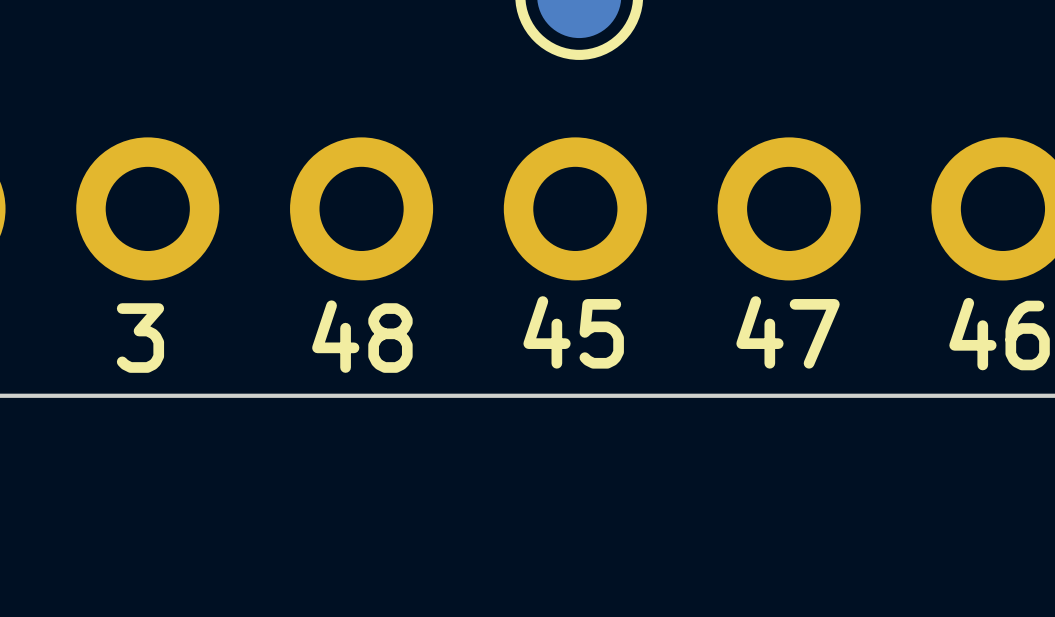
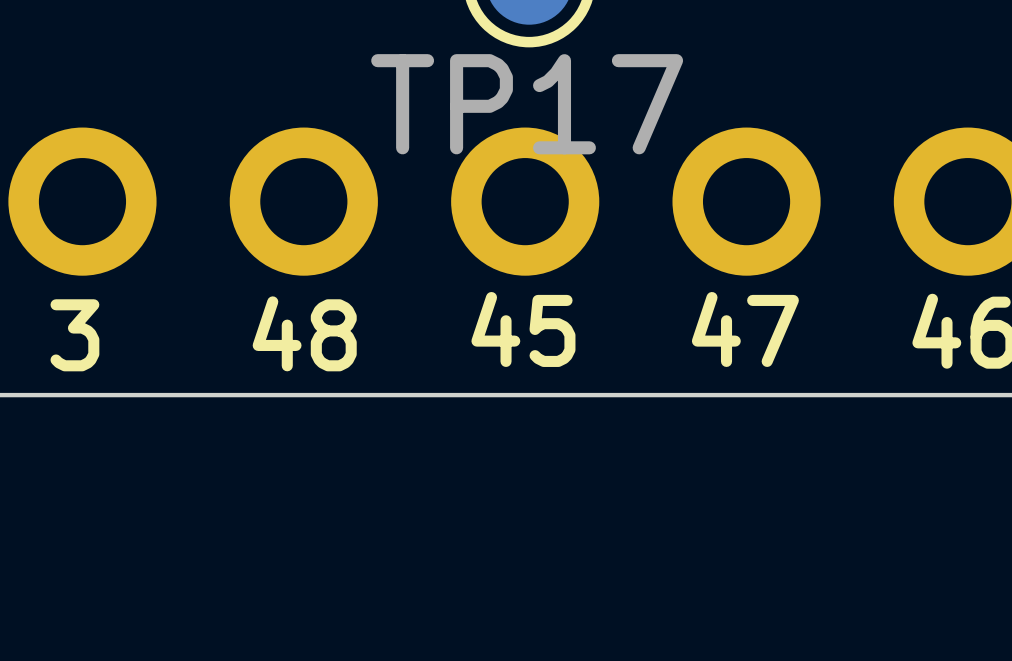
TP17 name: none -> TP17 (527, 104)

